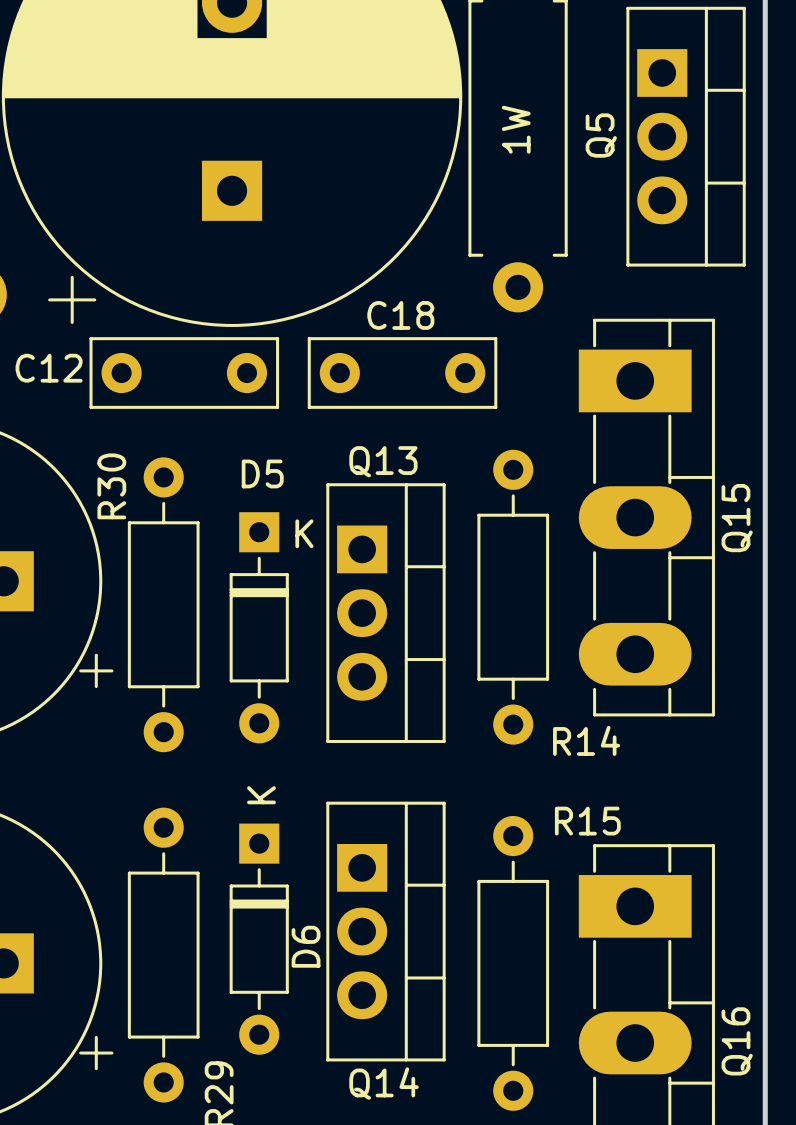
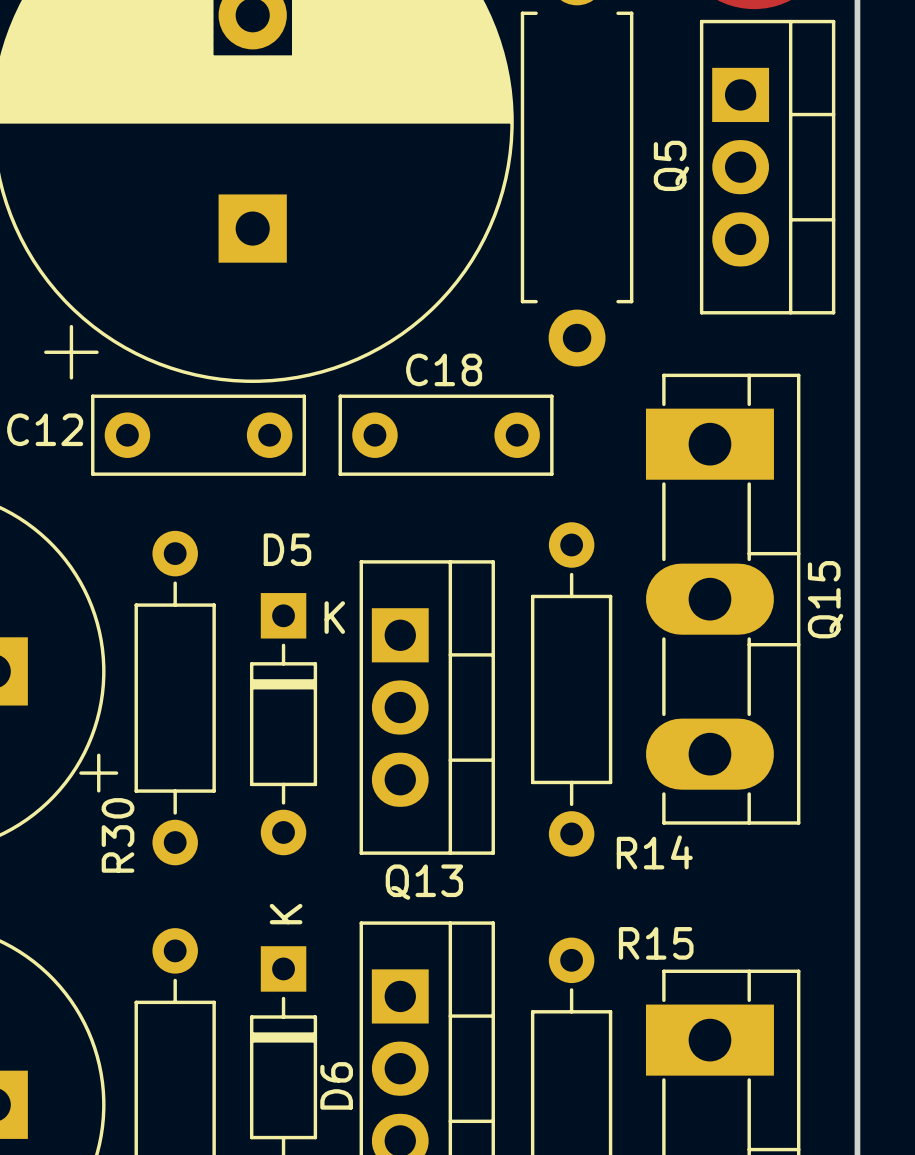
text: 1W (516, 129) -> none
Q13 name position: Q13 (383, 461) -> Q13 (424, 882)
R30 name position: R30 (111, 486) -> R30 (118, 835)

